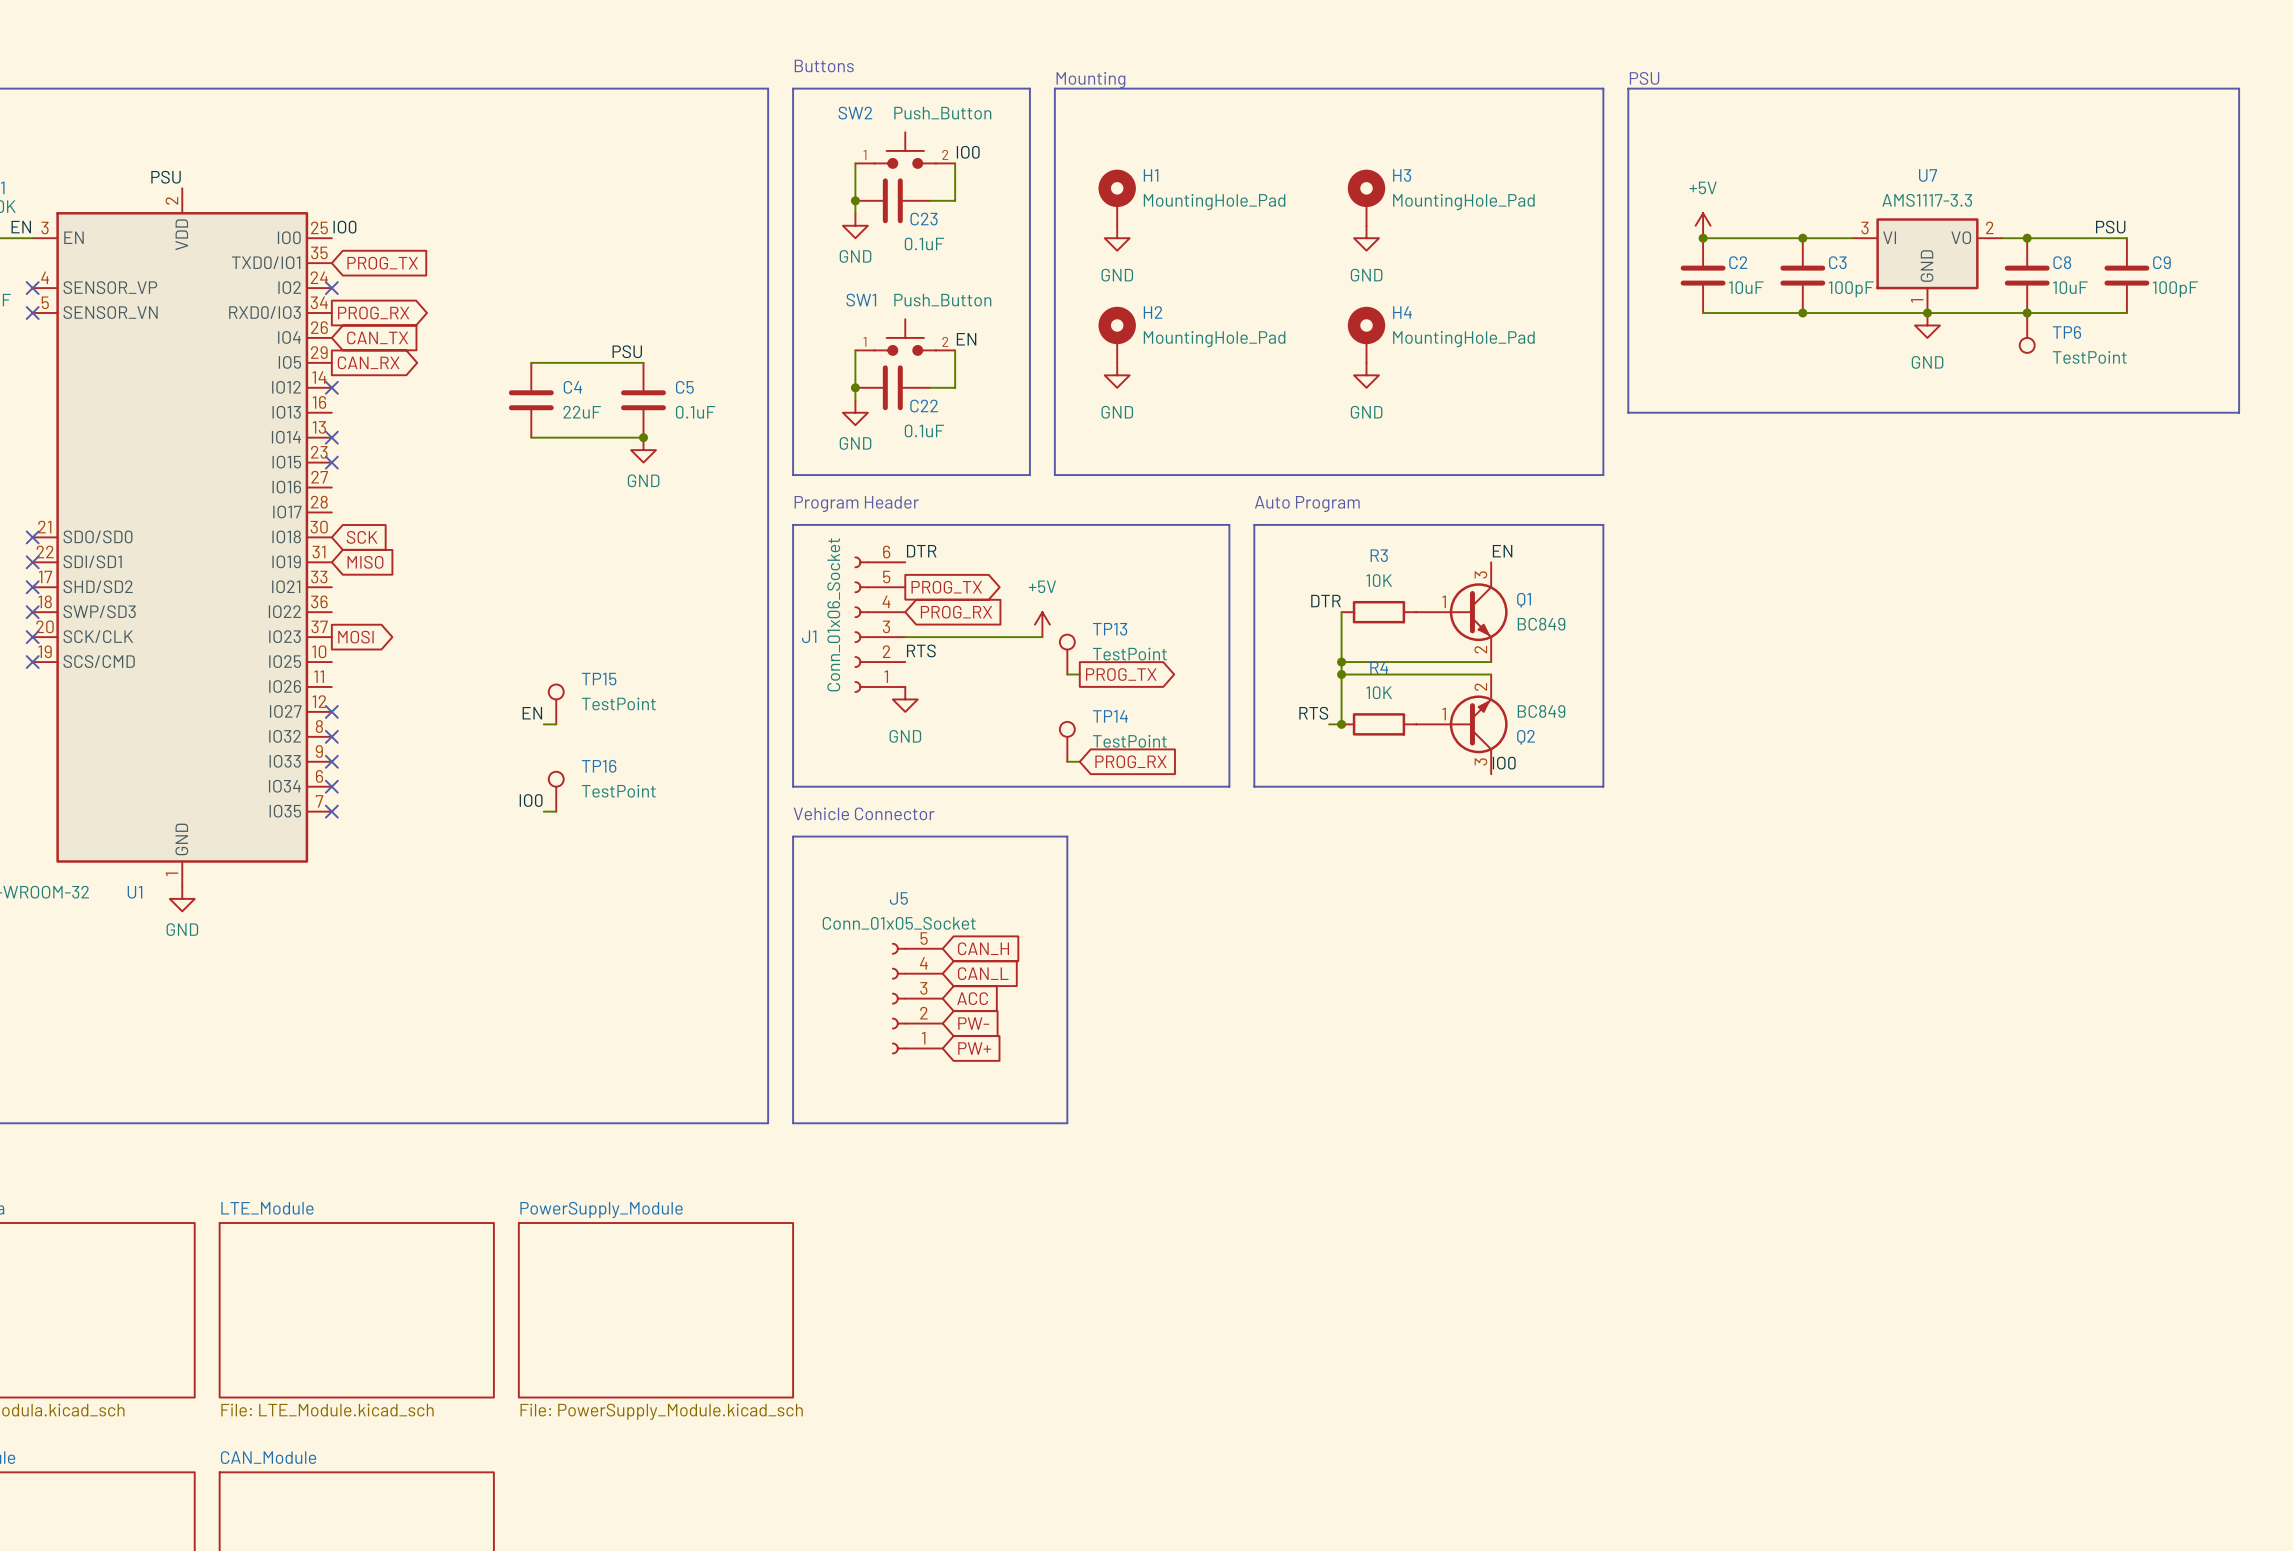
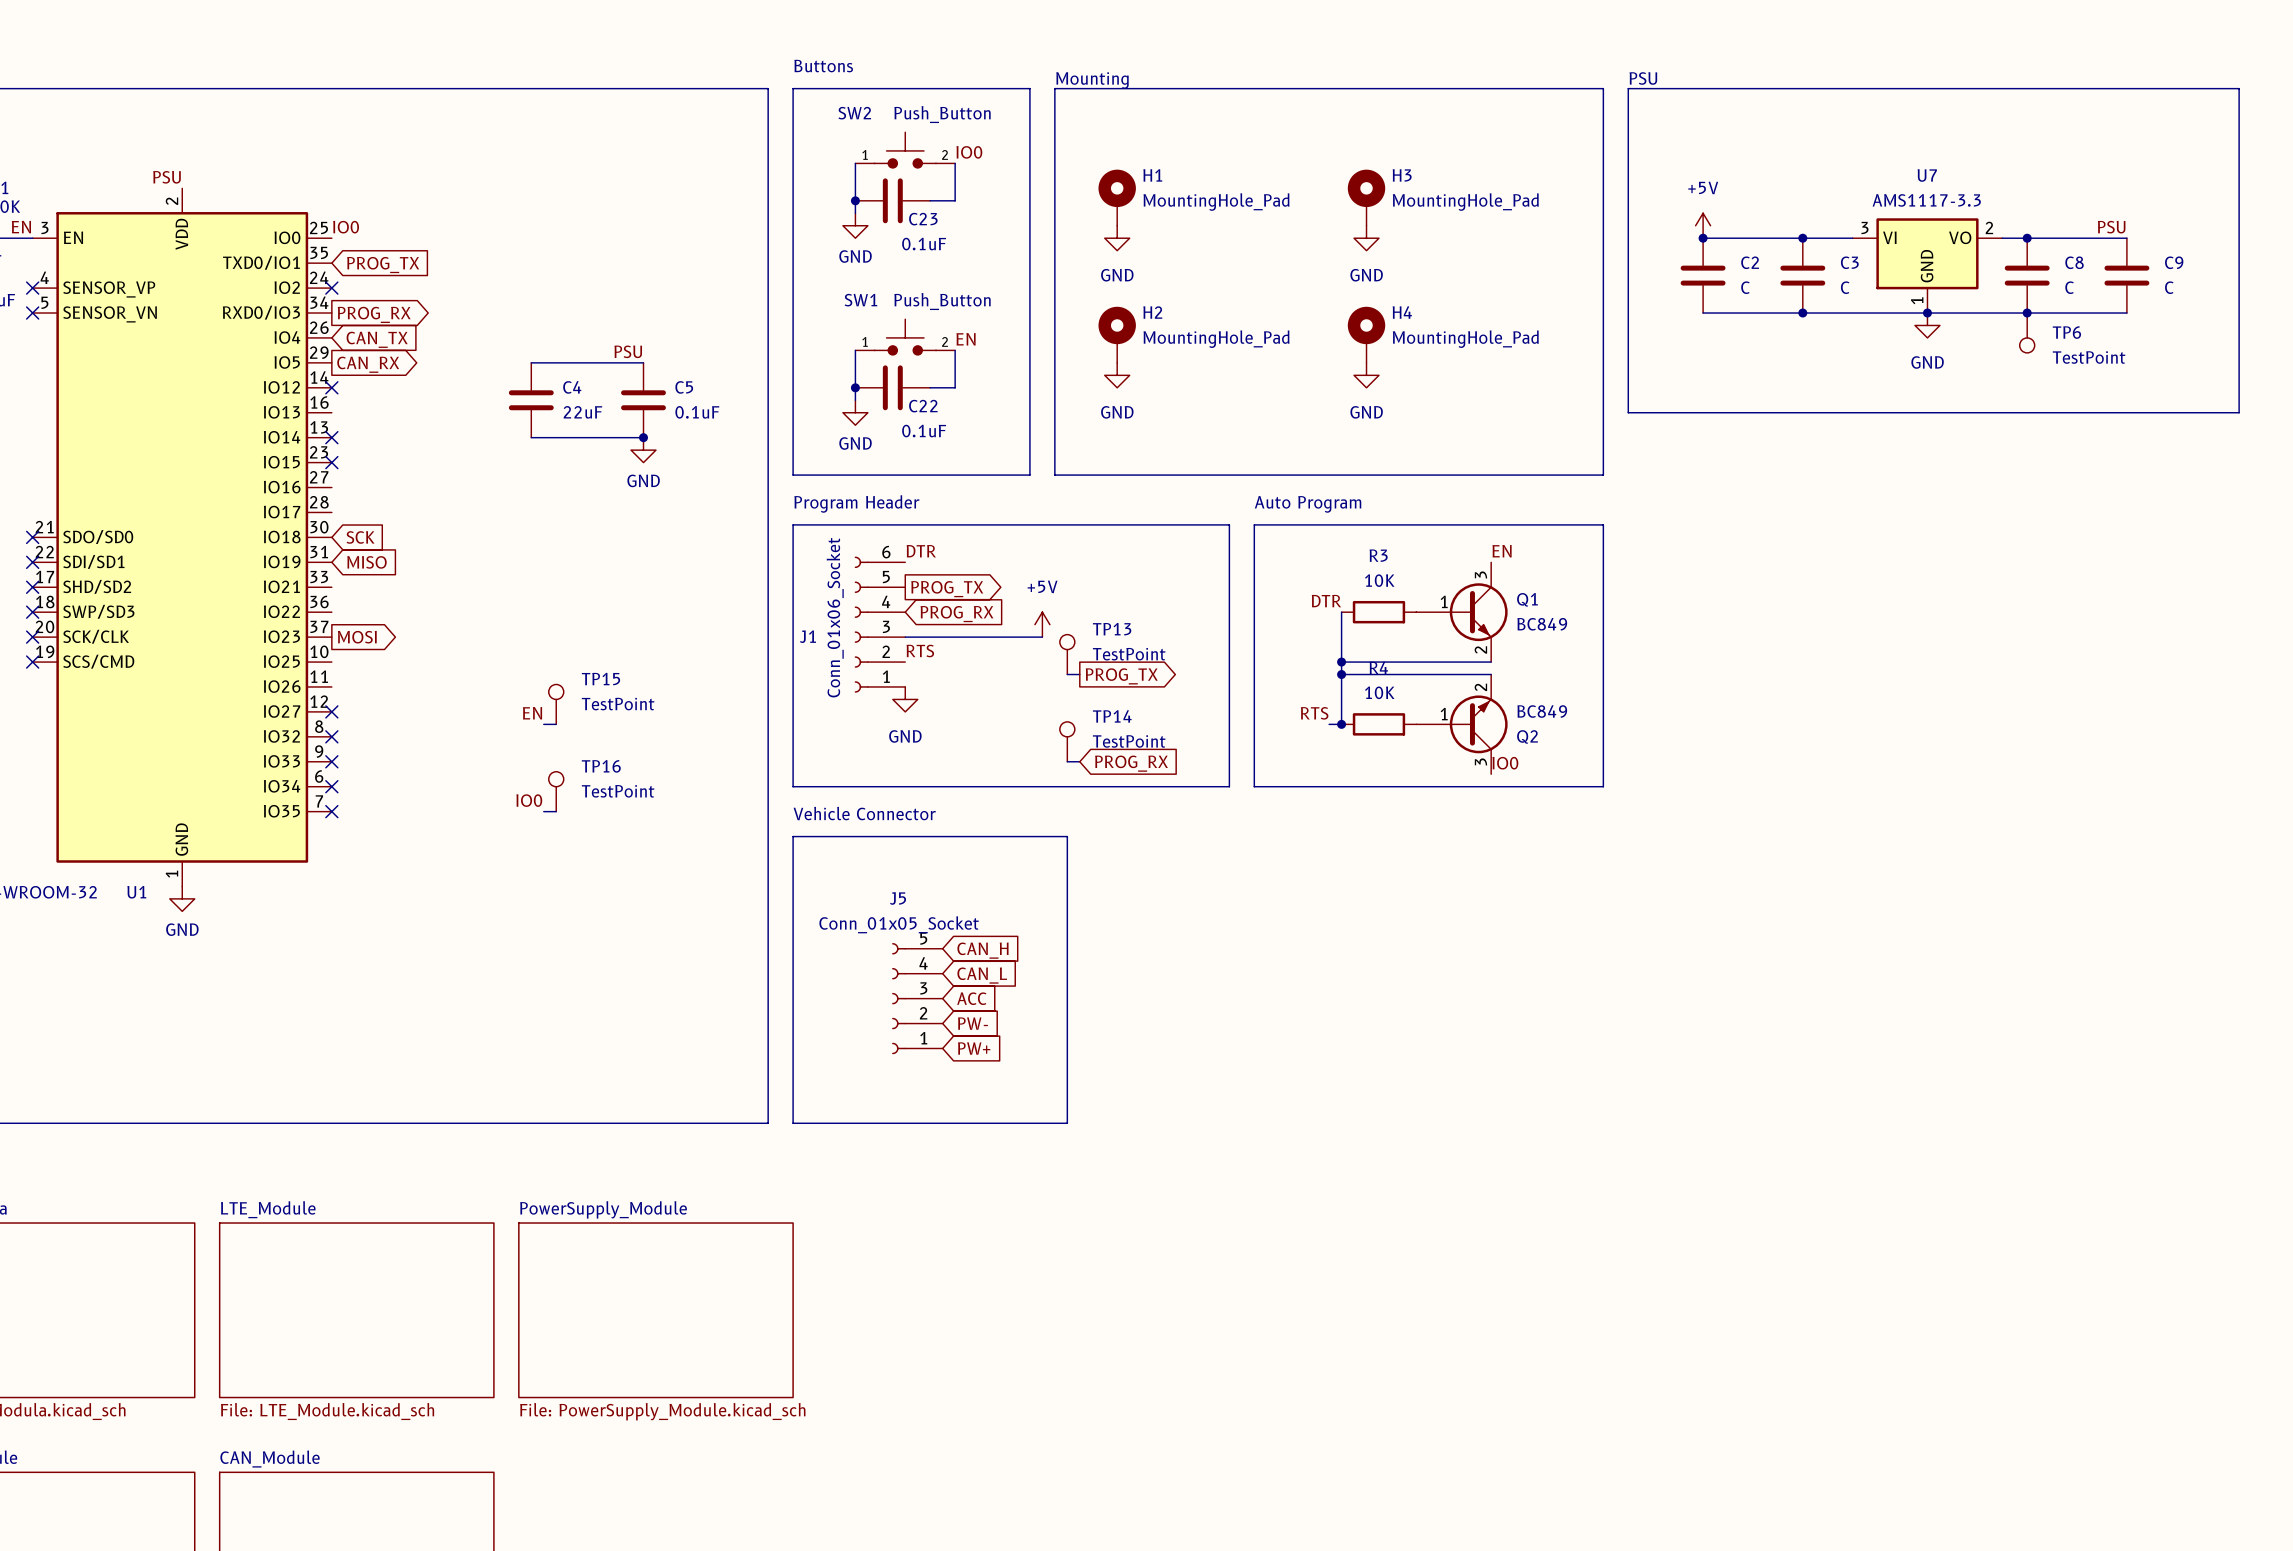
C2 name position: C2 (1738, 262) -> C2 (1750, 262)
C3 name position: C3 (1837, 262) -> C3 (1849, 262)
C8 name position: C8 (2062, 262) -> C8 (2074, 262)
C9 name position: C9 (2161, 262) -> C9 (2174, 262)
C2 value: 10uF (1746, 287) -> C (1745, 287)
C8 value: 10uF (2070, 287) -> C (2069, 287)
C3 value: 100pF (1851, 289) -> C (1845, 287)
C9 value: 100pF (2175, 289) -> C (2169, 287)

